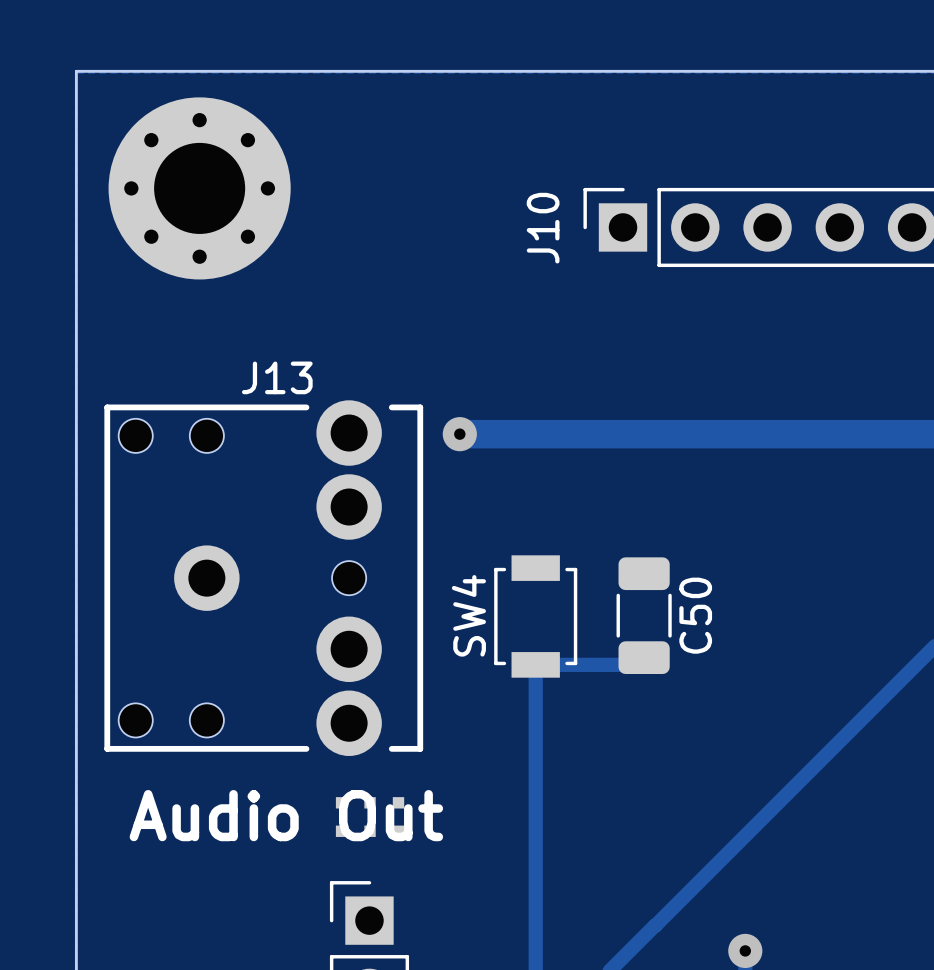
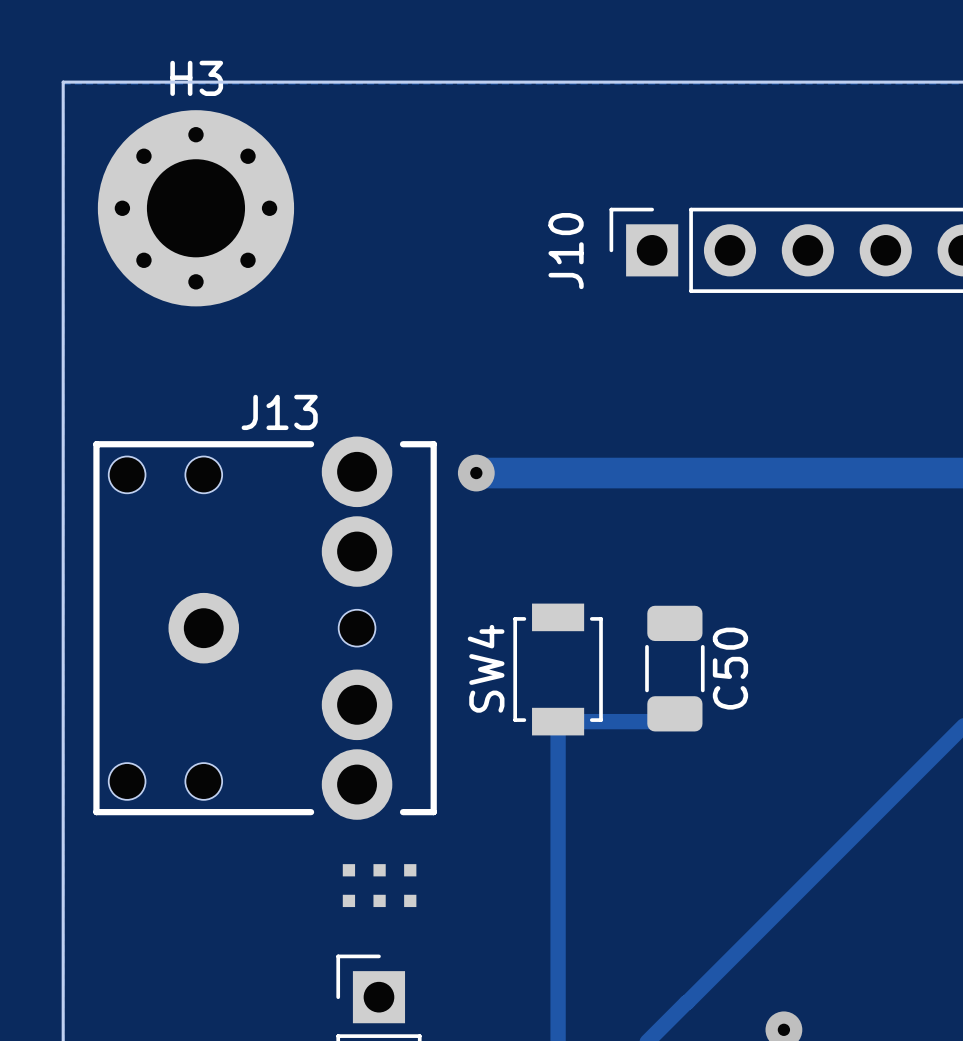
H3 name: none -> H3 (196, 78)
text: Audio Out (286, 815) -> none

